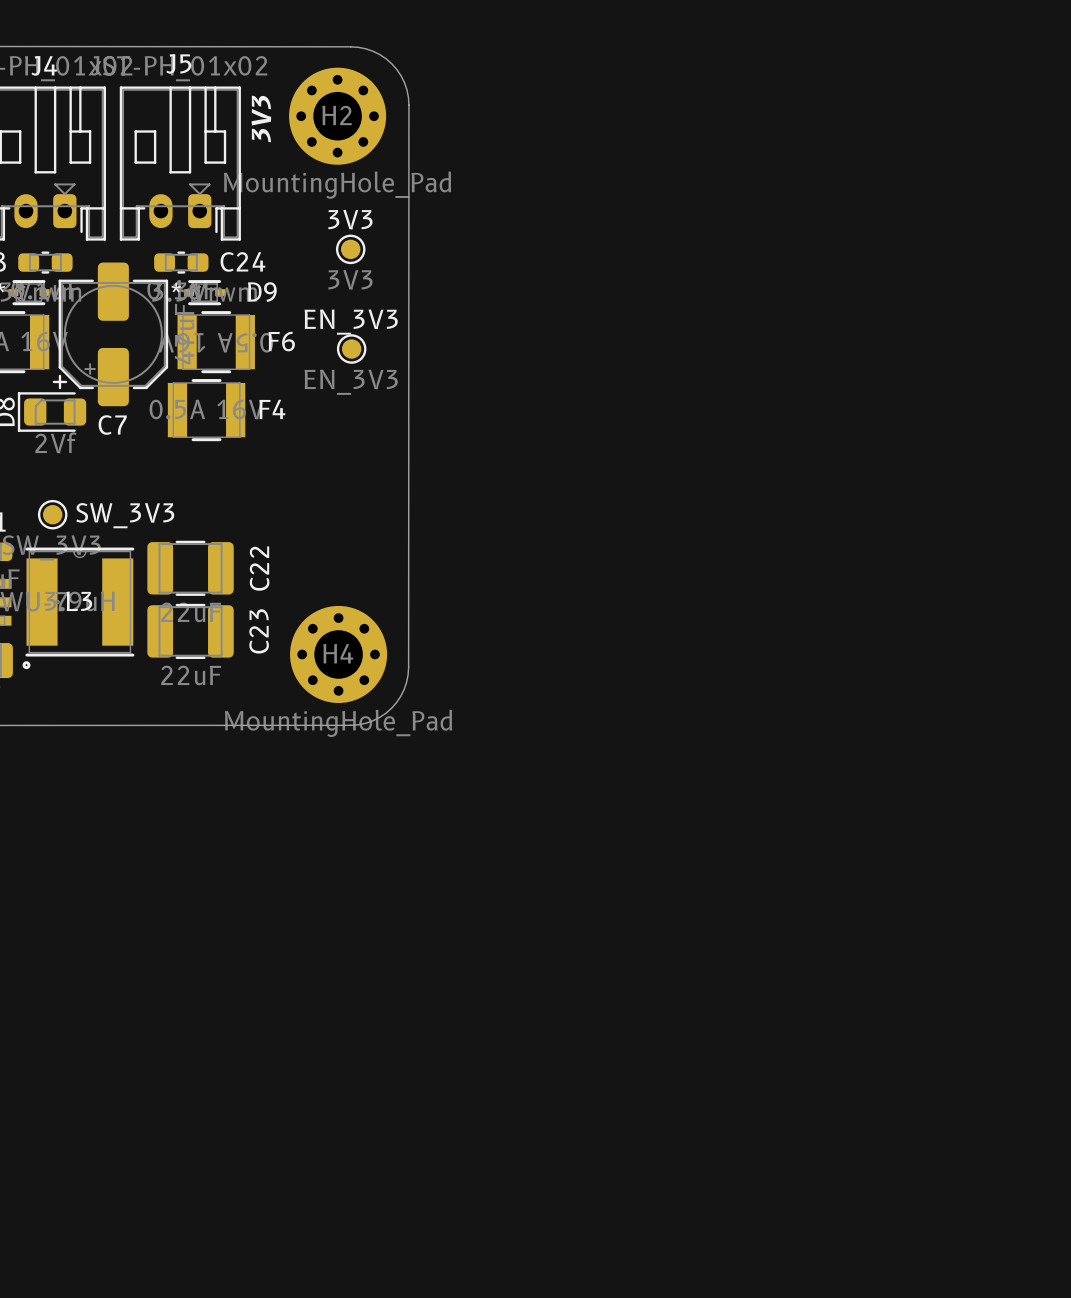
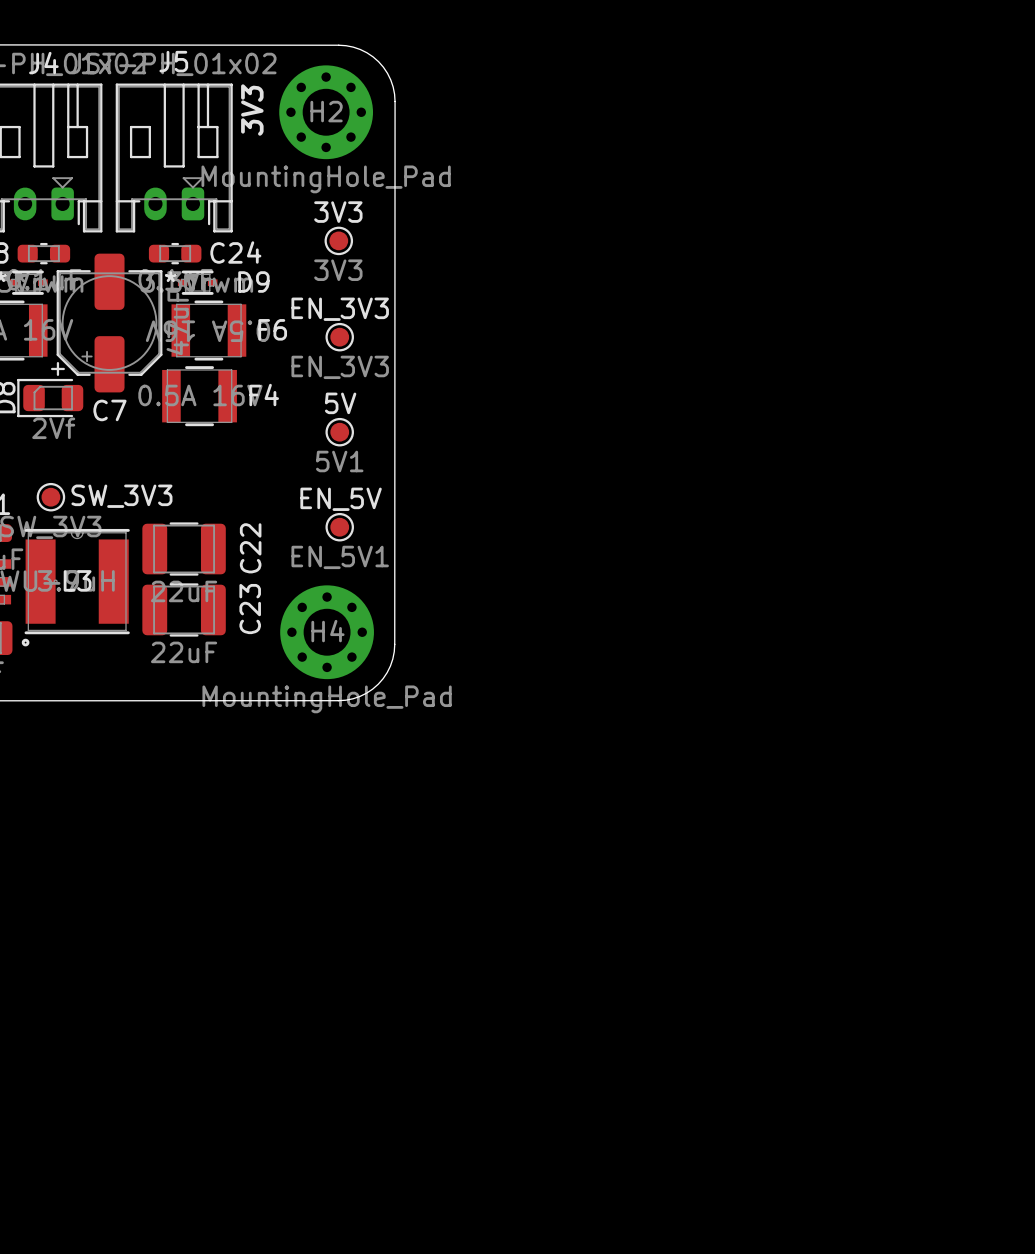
5V1: none -> 5V (339, 432)
EN_5V1: none -> EN_5V (339, 527)

